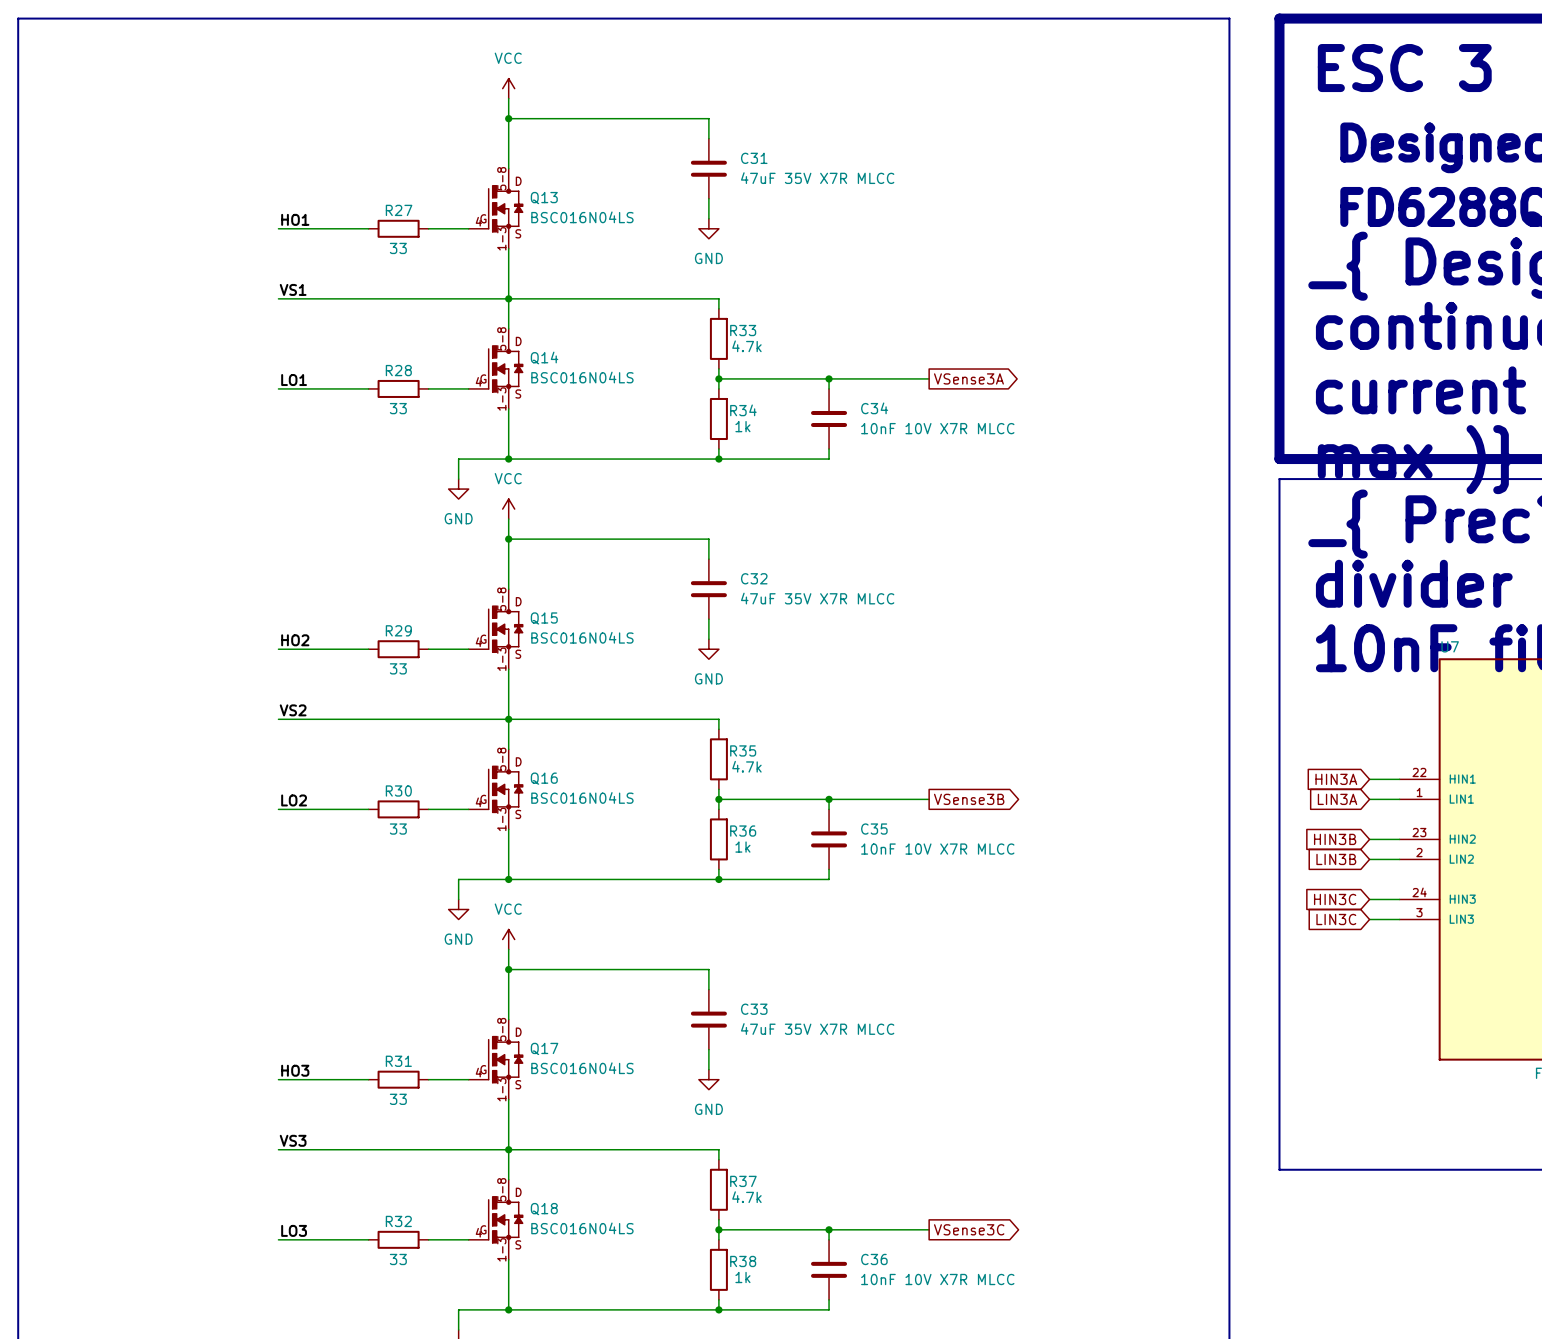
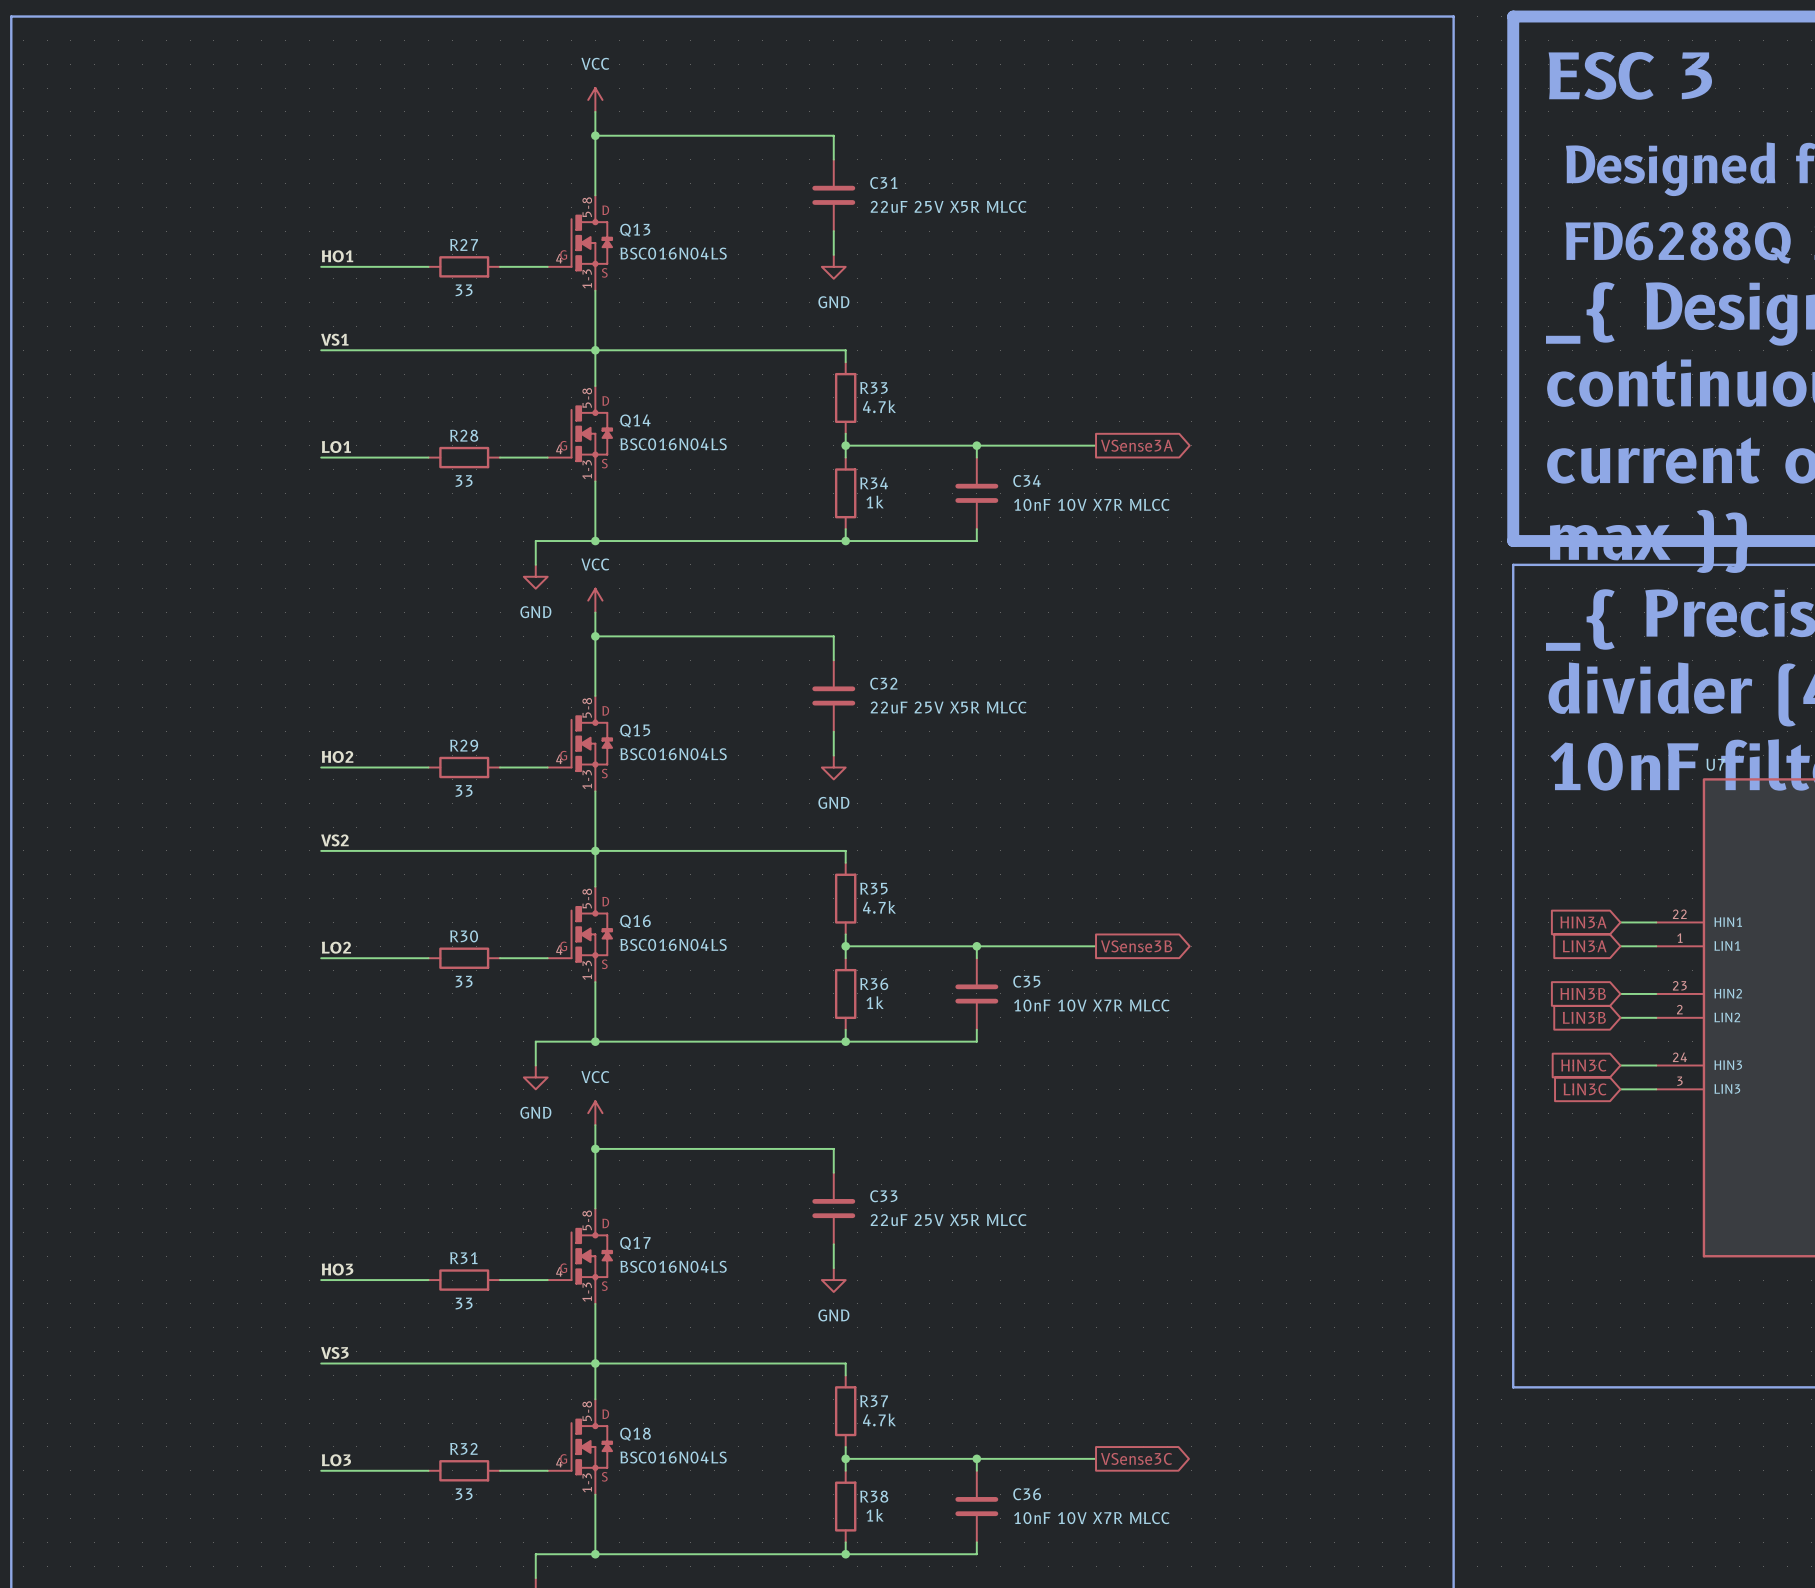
C31 value: 47uF 35V X7R MLCC (817, 178) -> 22uF 25V X5R MLCC (948, 206)
C32 value: 47uF 35V X7R MLCC (817, 598) -> 22uF 25V X5R MLCC (948, 707)
C33 value: 47uF 35V X7R MLCC (817, 1029) -> 22uF 25V X5R MLCC (948, 1220)

